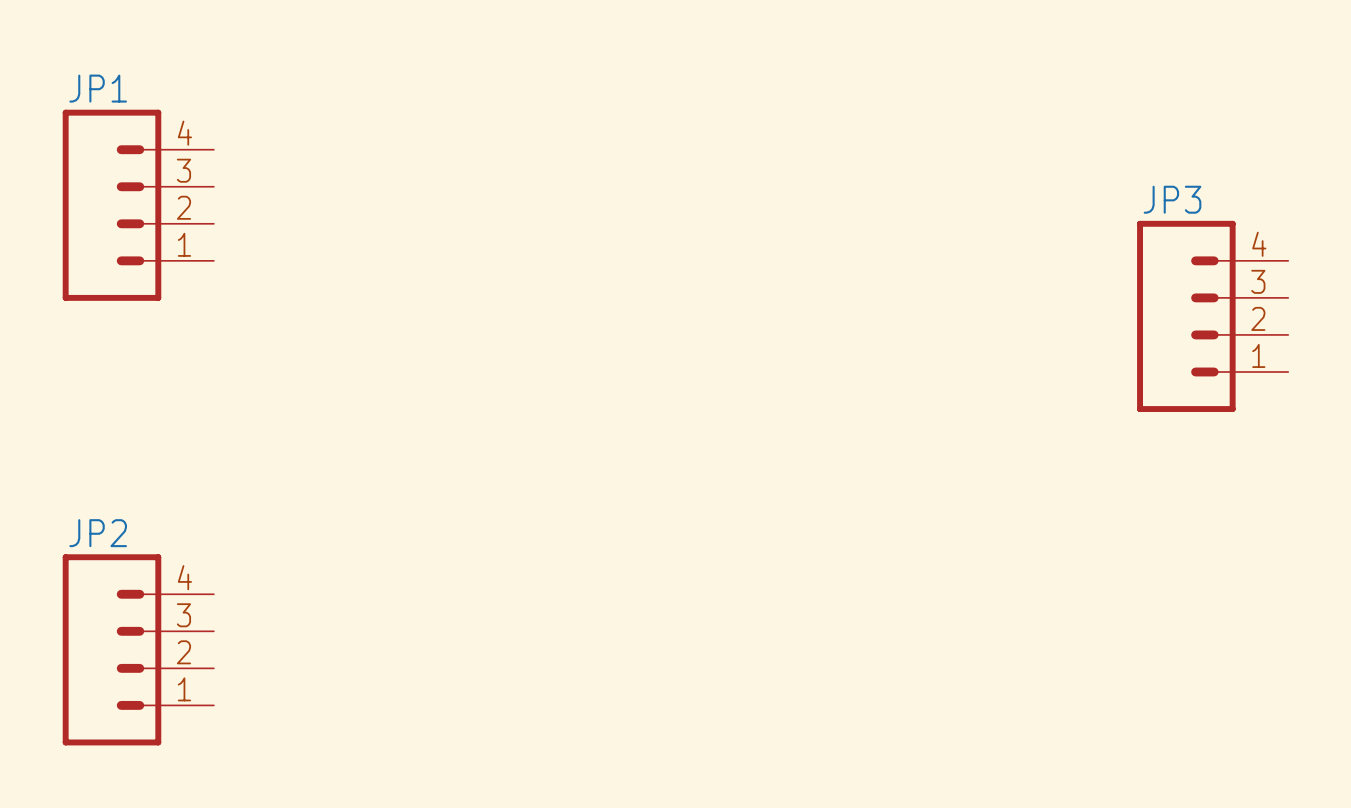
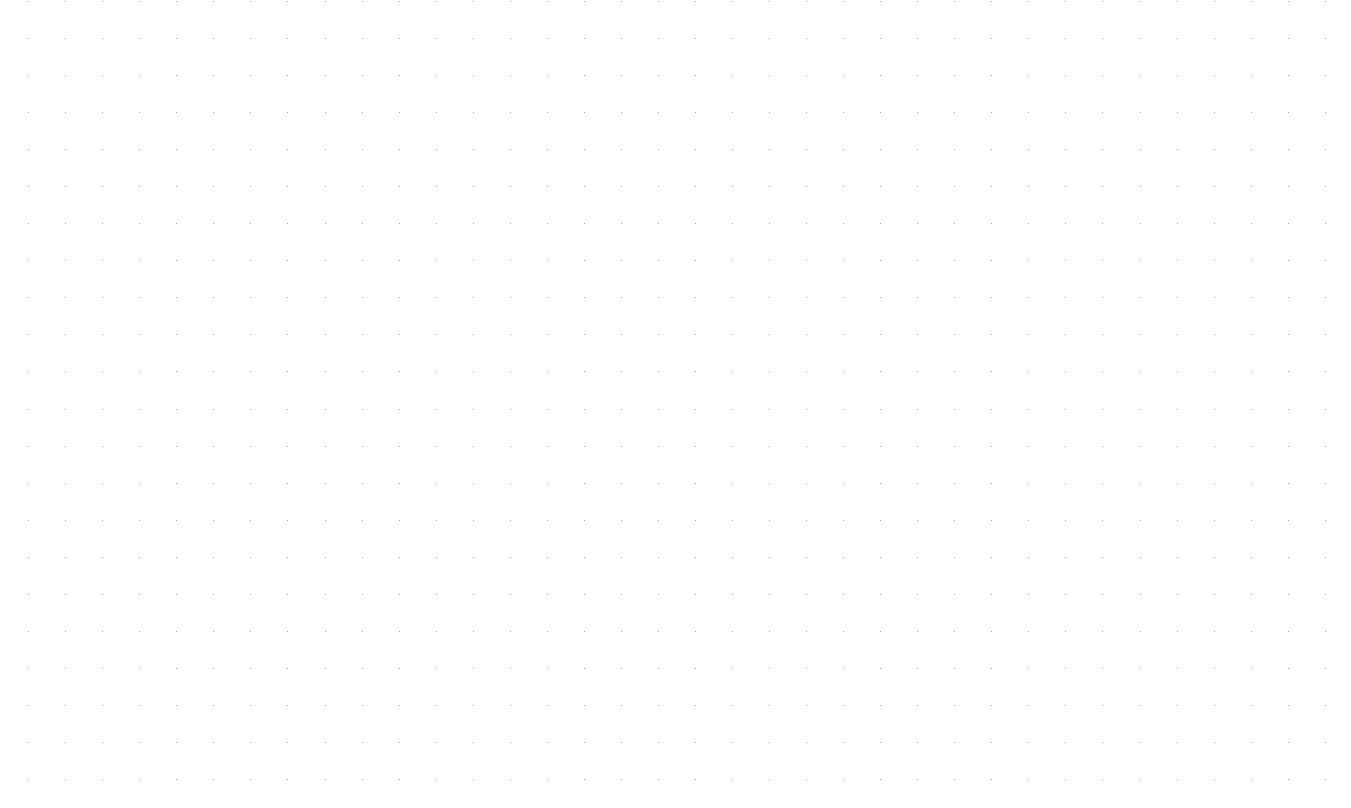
JP1: (138, 205) -> none
JP3: (1212, 316) -> none
JP2: (138, 649) -> none

